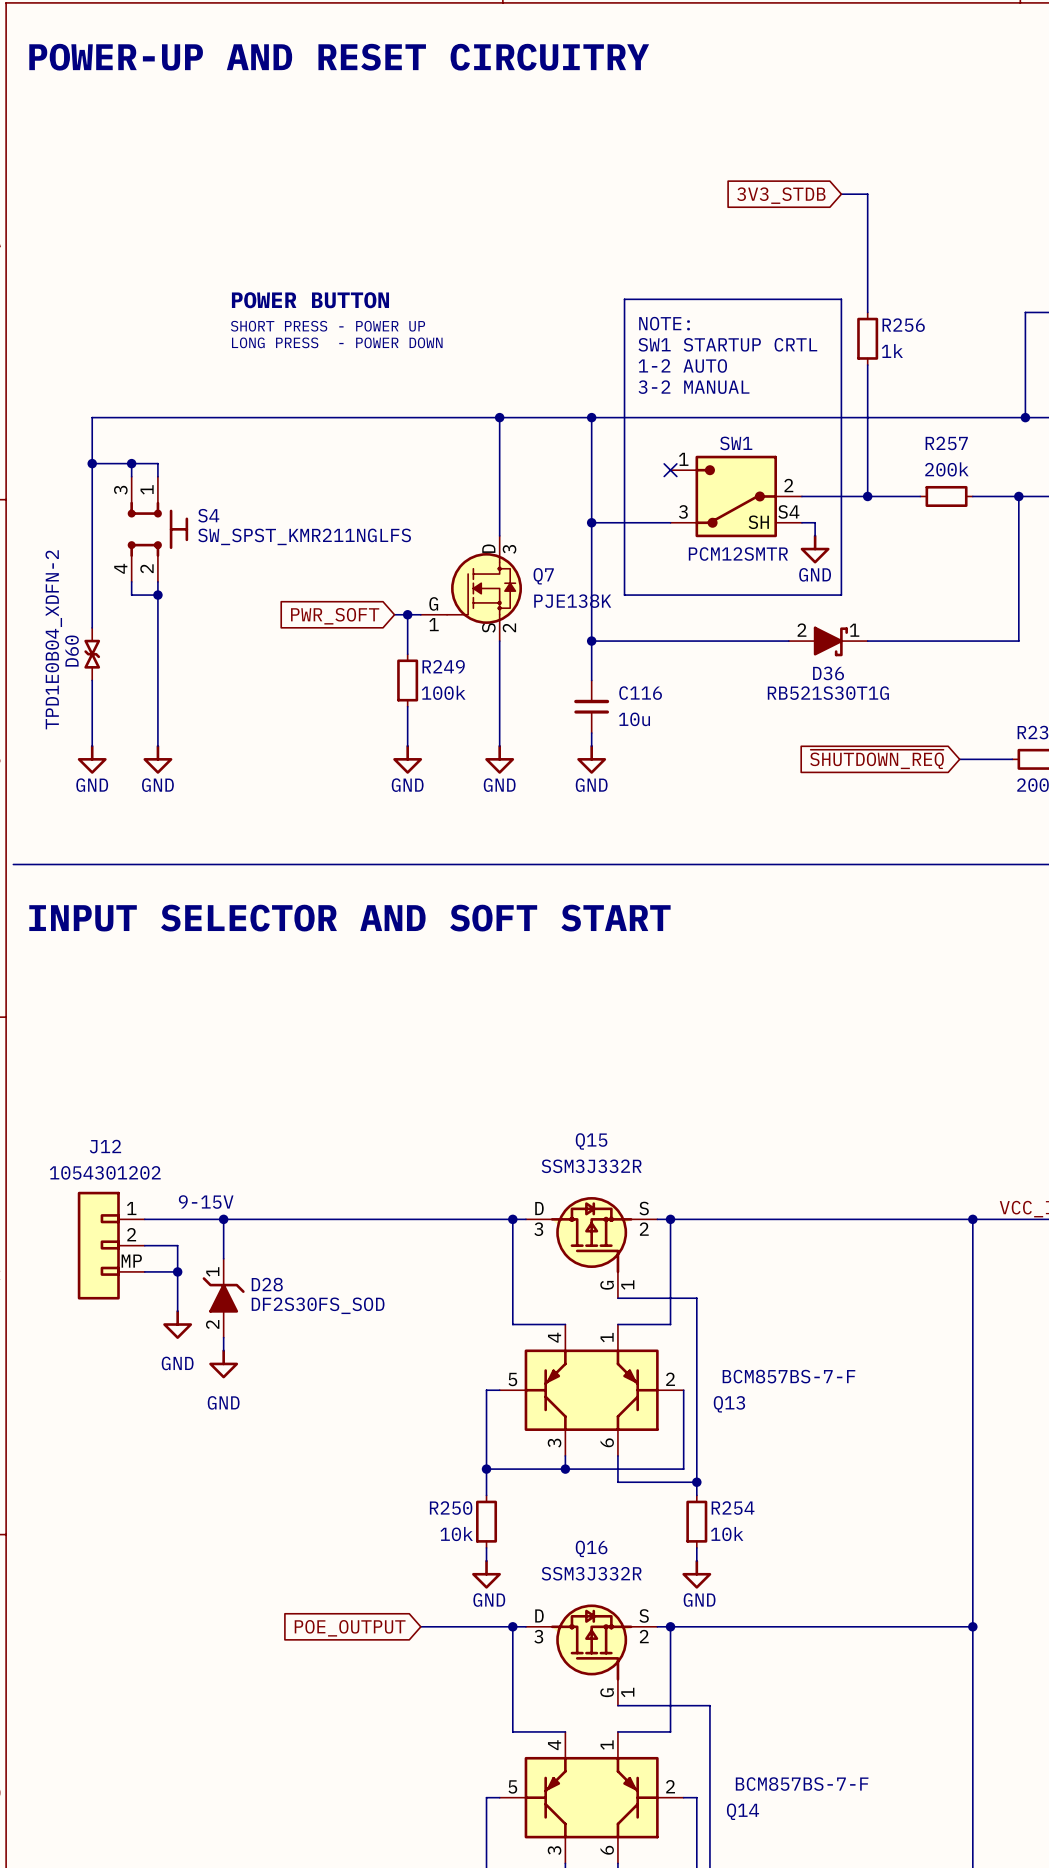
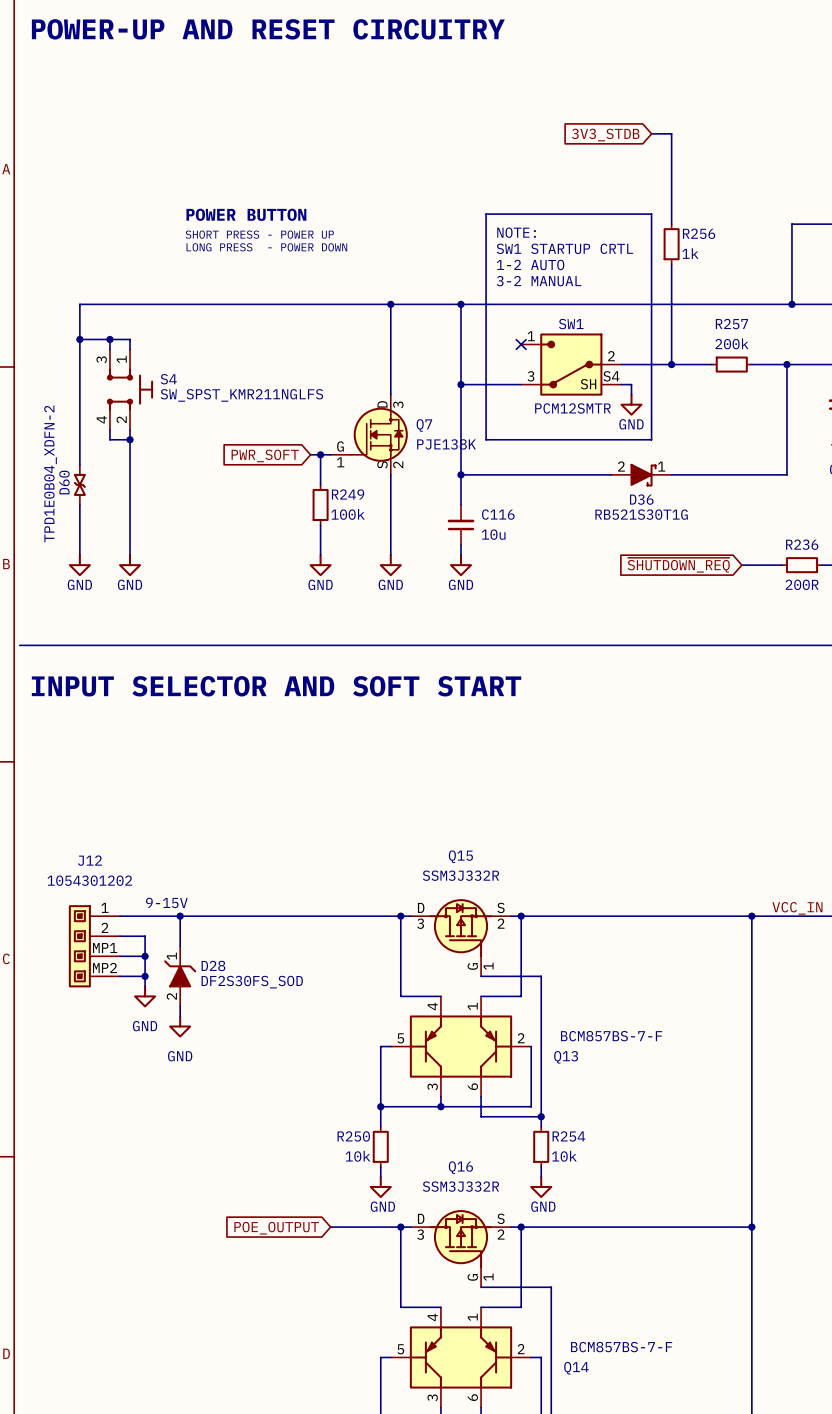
J12 symbol: [77, 1191, 145, 1300] -> [68, 905, 120, 988]
wire: none -> (119, 976) (145, 976)
junction: none -> (145, 976)

